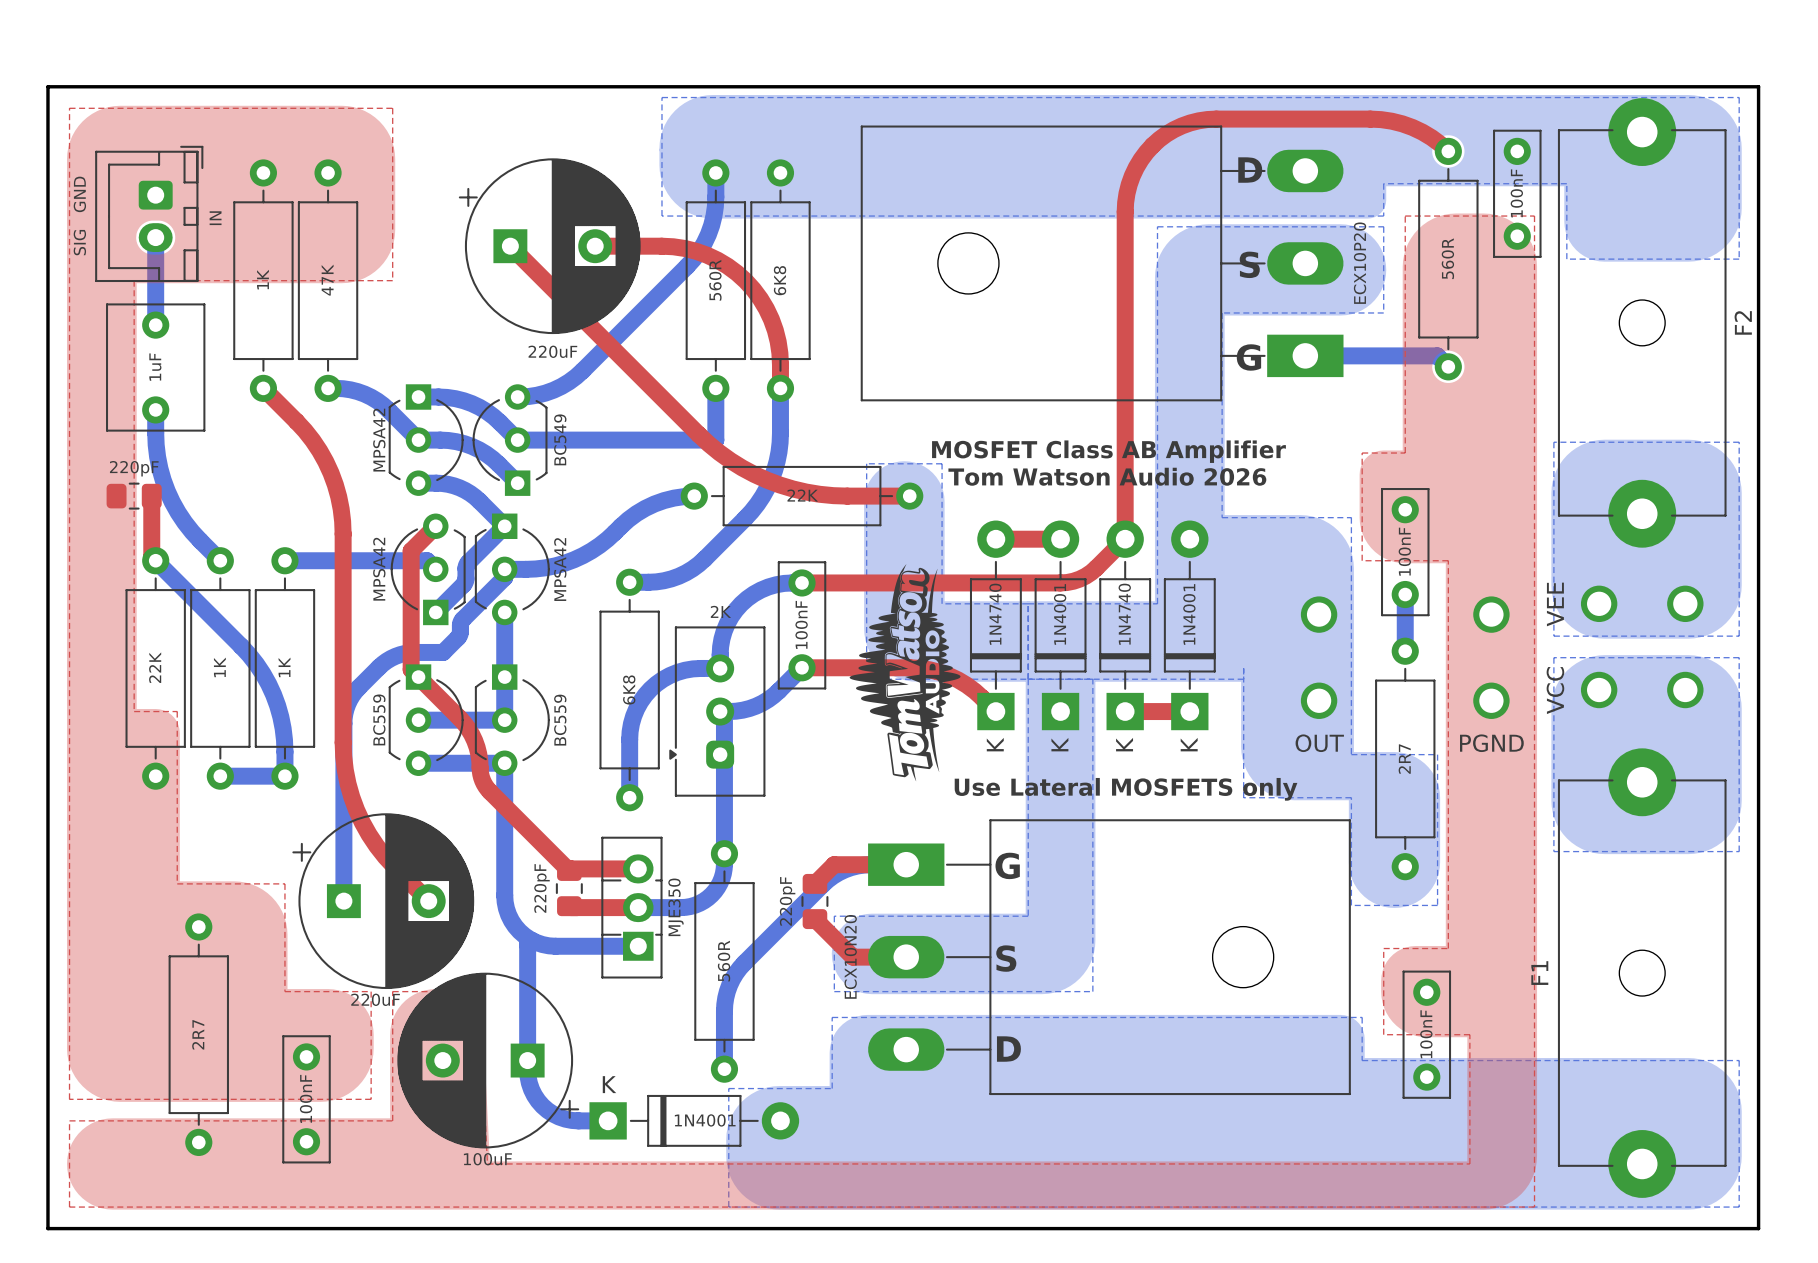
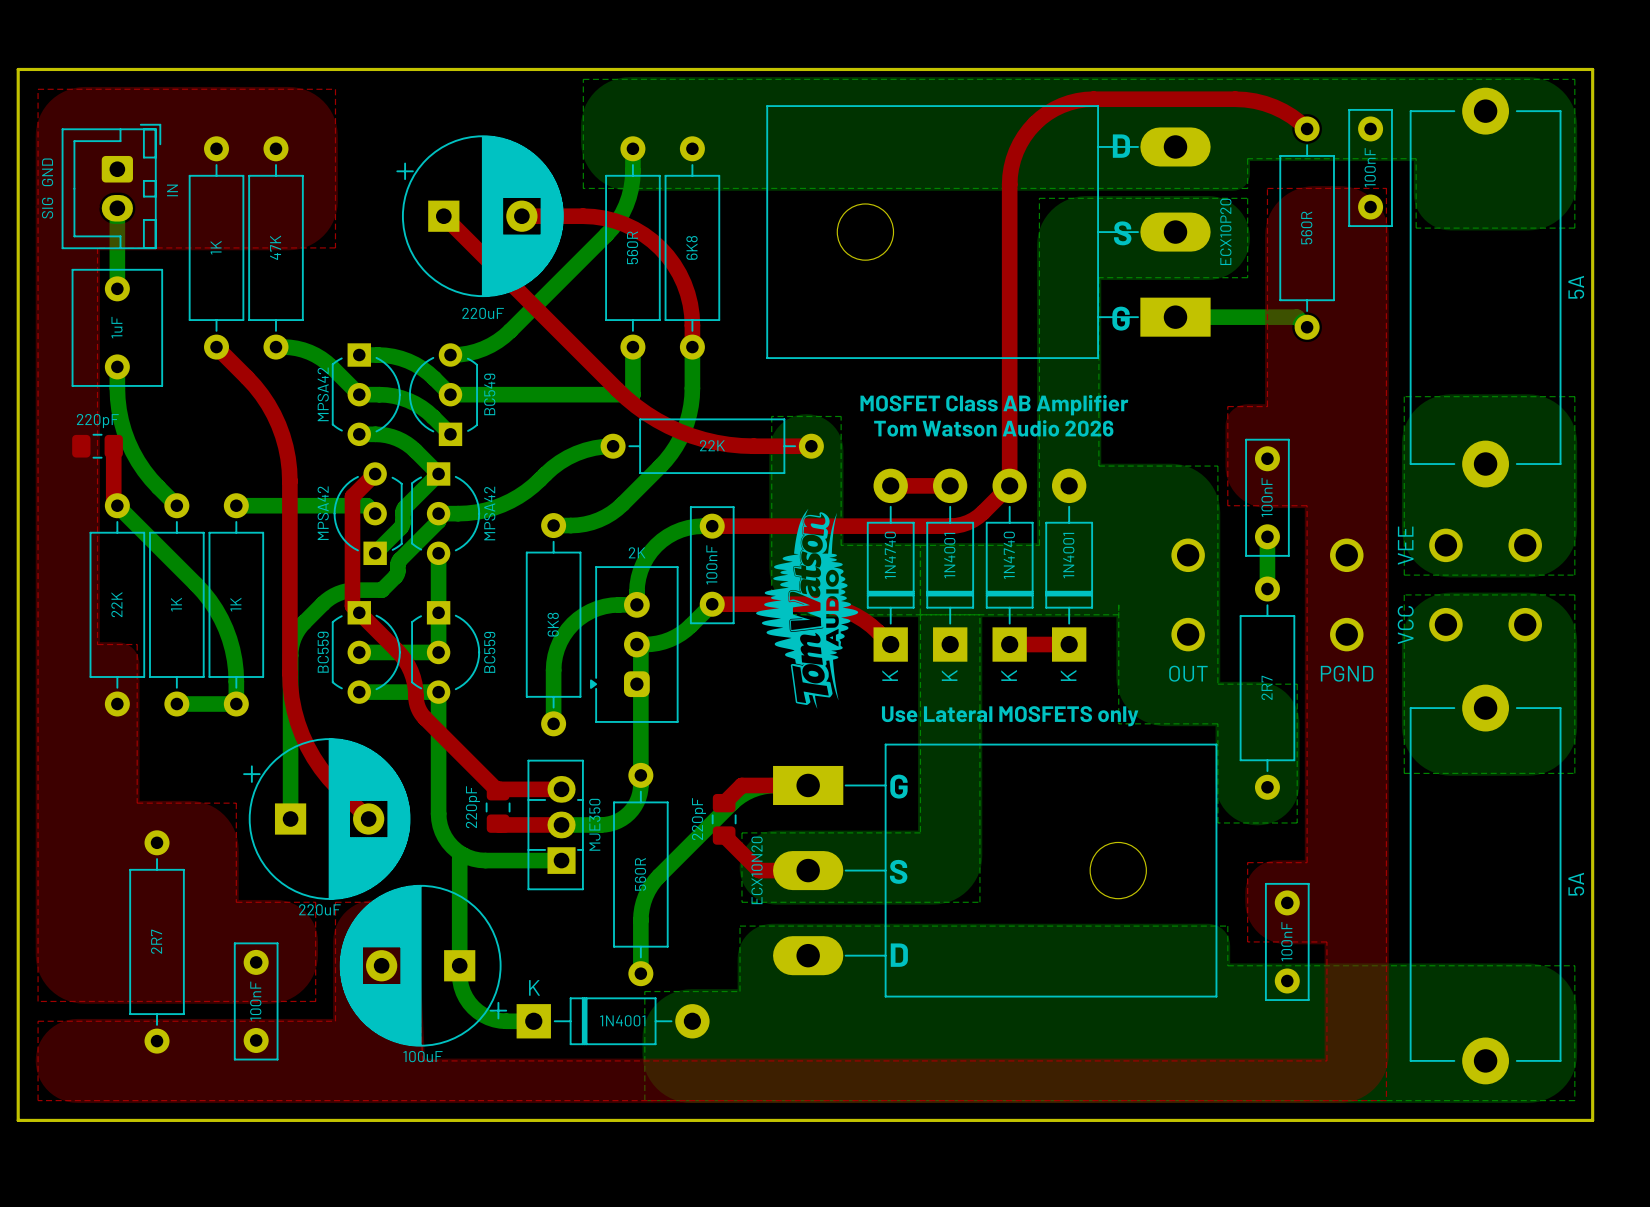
F2: (1642, 322) -> none
part: none -> 5A (1485, 287)
part: none -> 5A (1485, 884)
F1: (1642, 973) -> none

